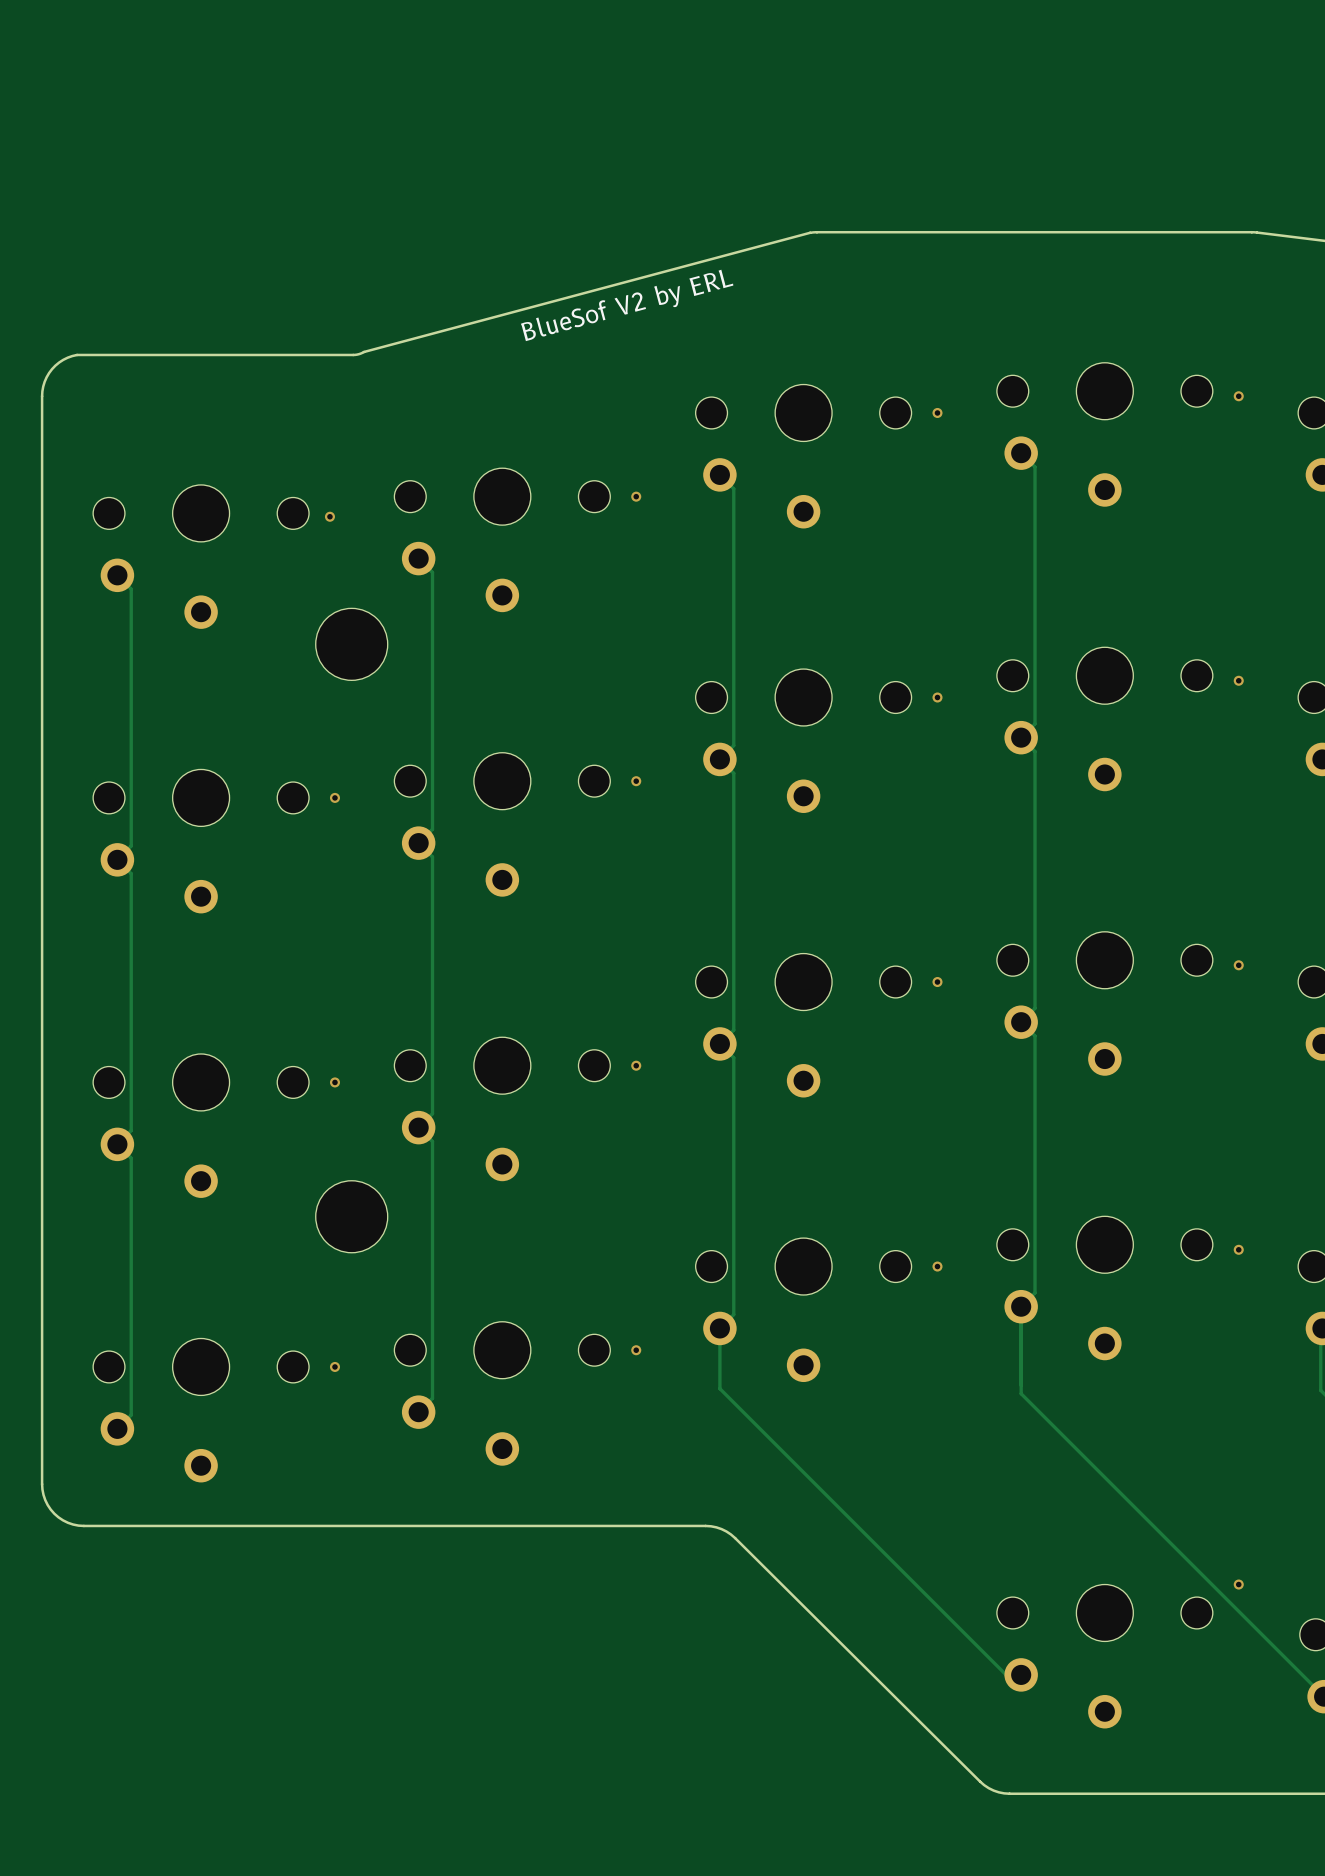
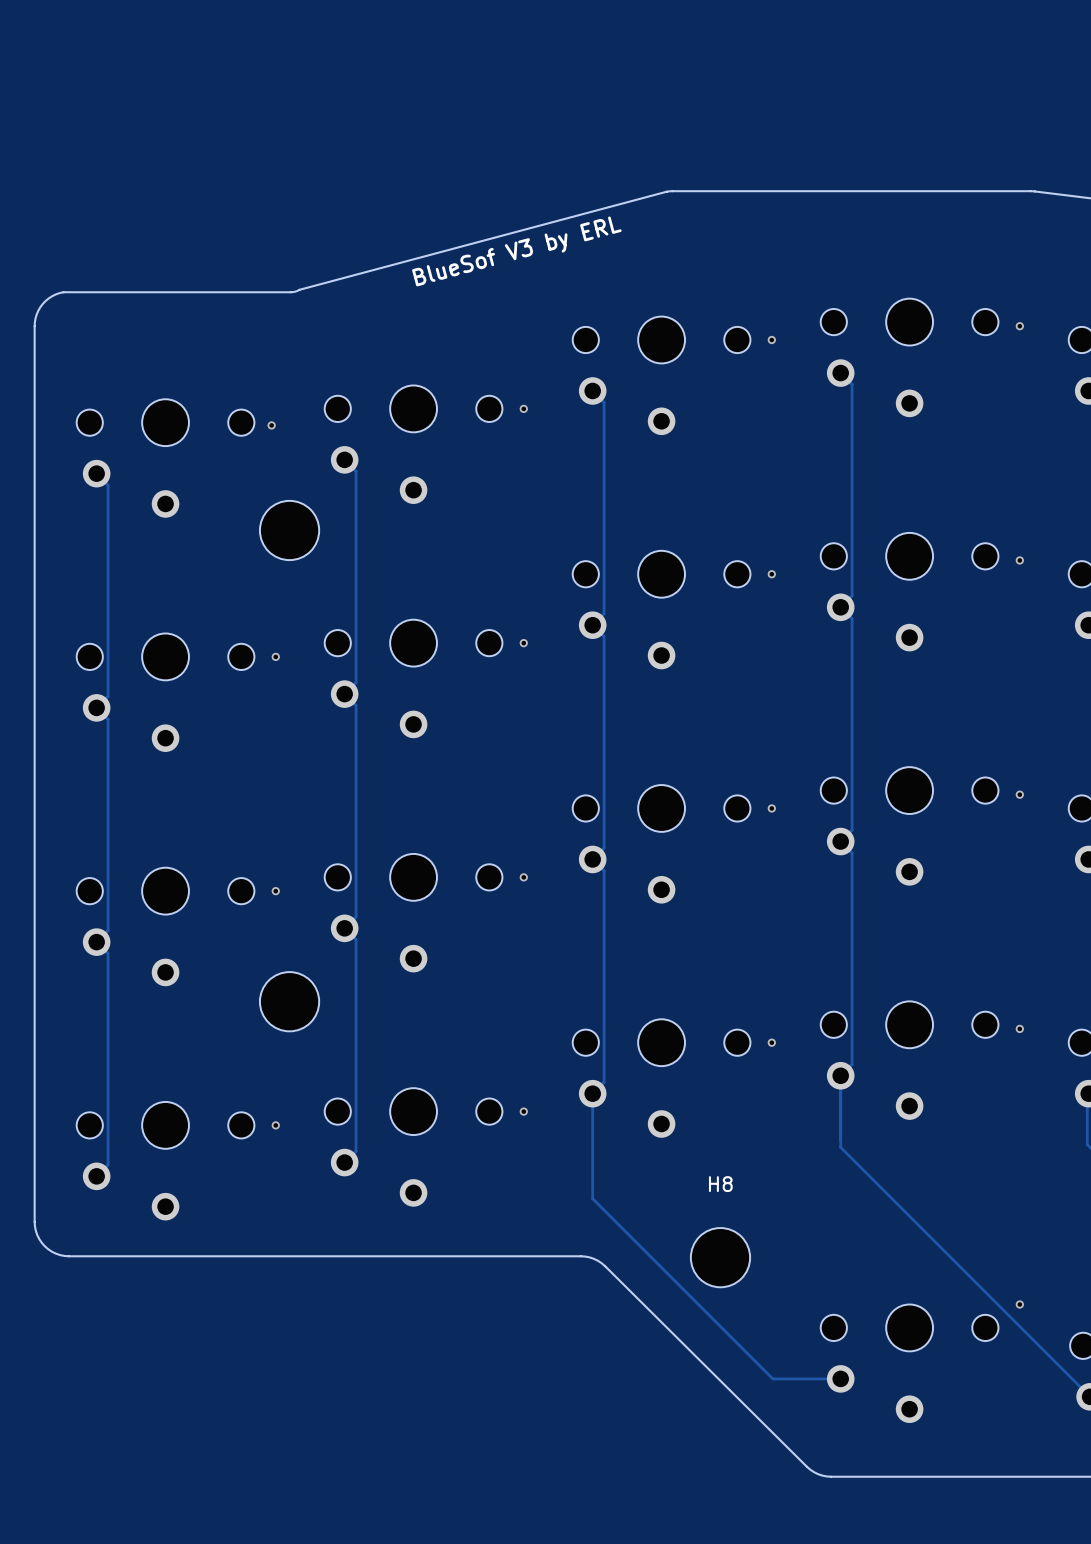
text: BlueSof V2 by ERL (627, 305) -> BlueSof V3 by ERL (516, 251)
track: (719, 1388) (1006, 1674) -> (592, 1143) (592, 1198) (772, 1378) (828, 1378)
H8: none -> (720, 1257)

